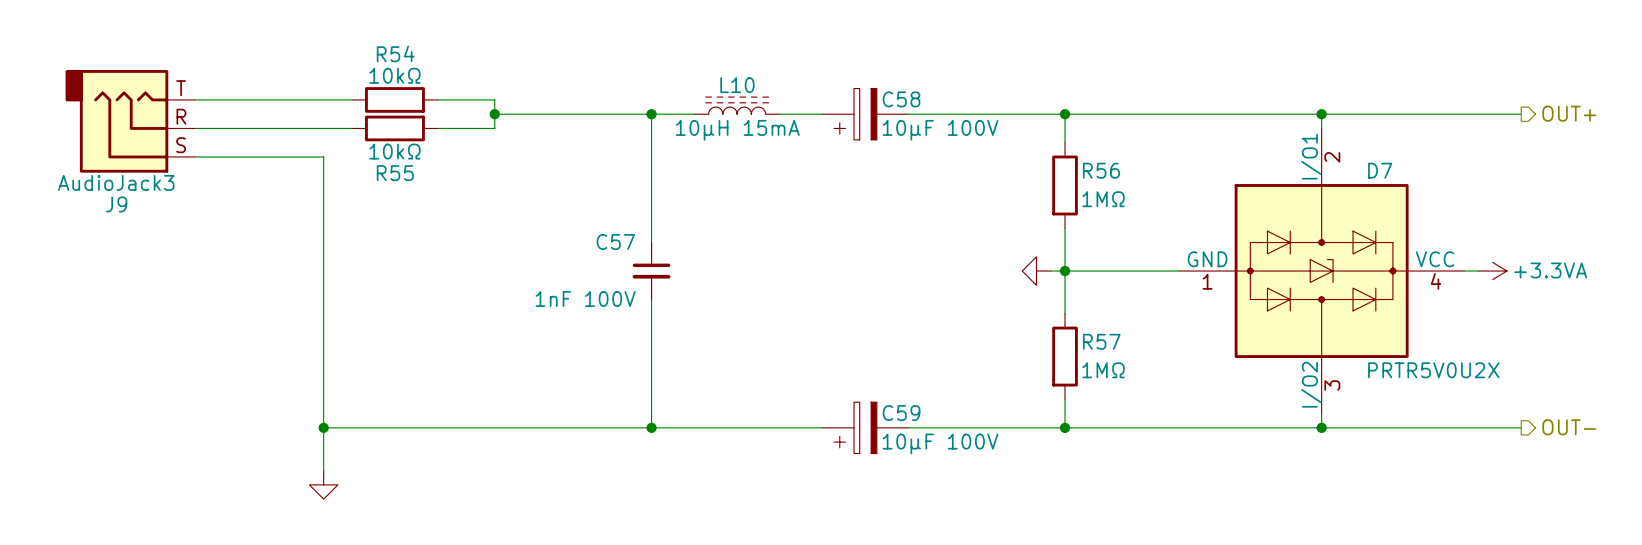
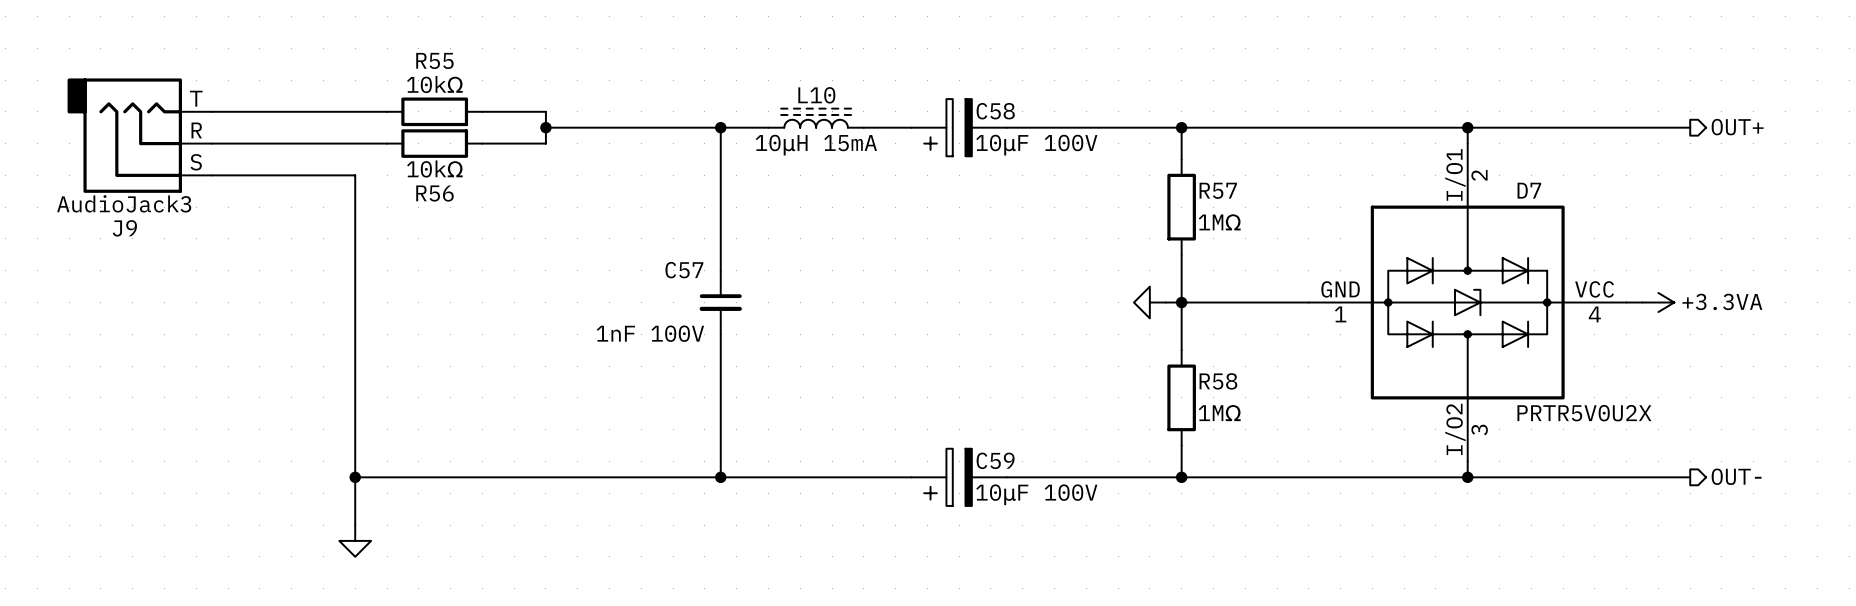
R54 name: R54 (395, 53) -> R55 (434, 60)
R56 name: R56 (1101, 170) -> R57 (1218, 190)
R55 name: R55 (395, 173) -> R56 (434, 193)
R57 name: R57 (1101, 341) -> R58 (1218, 381)

